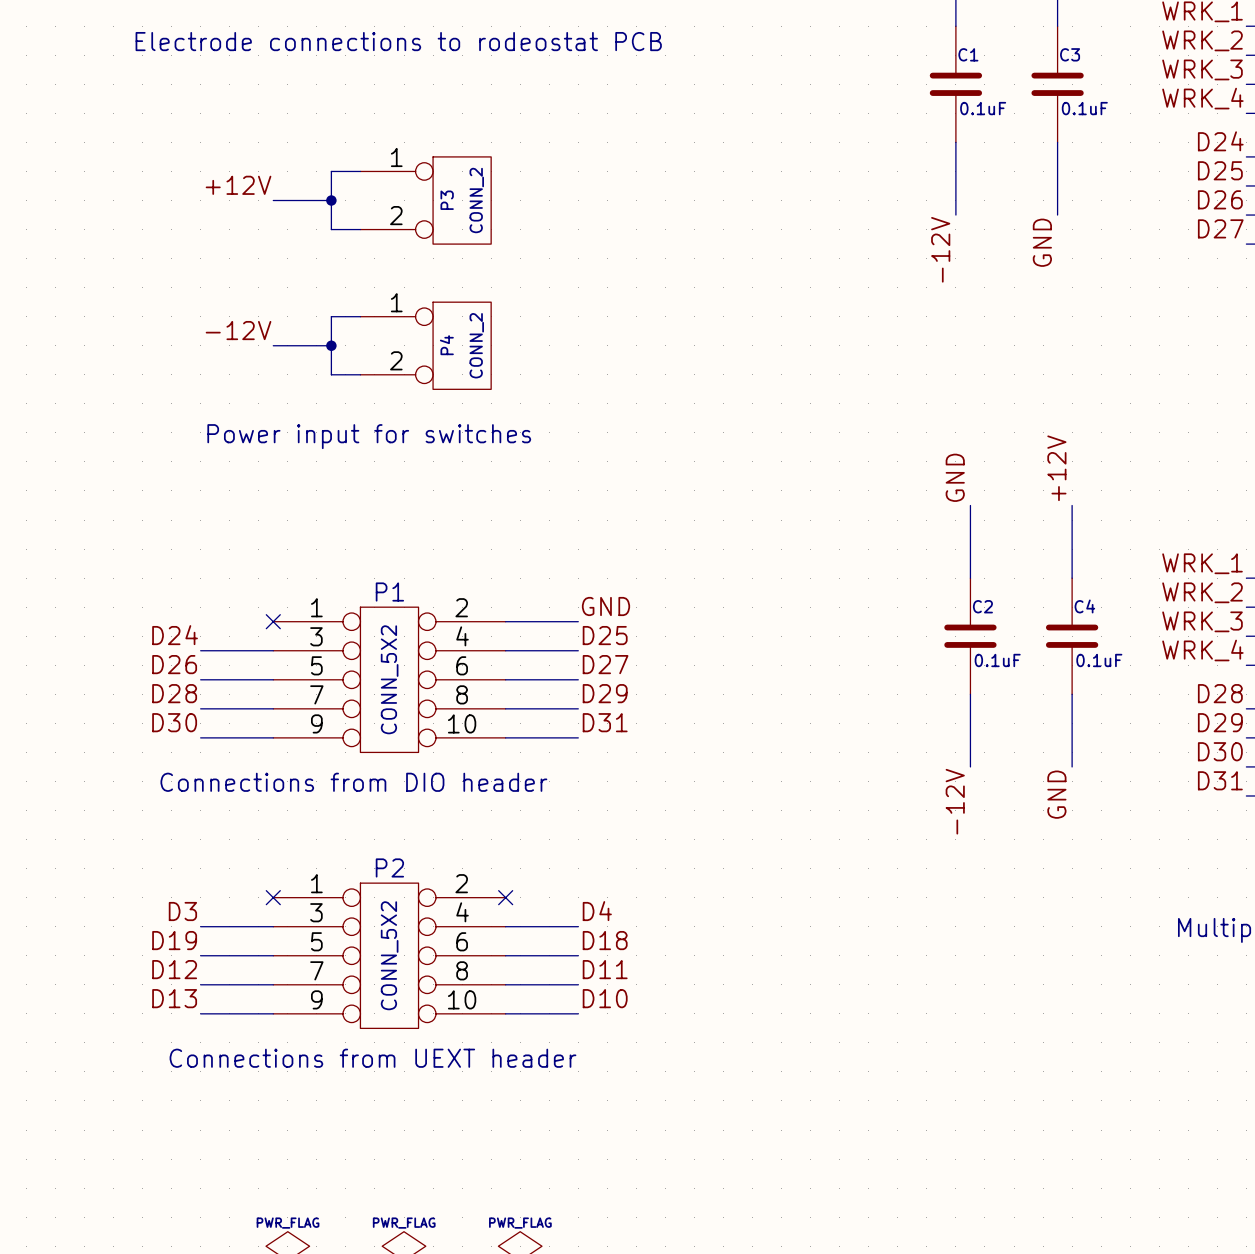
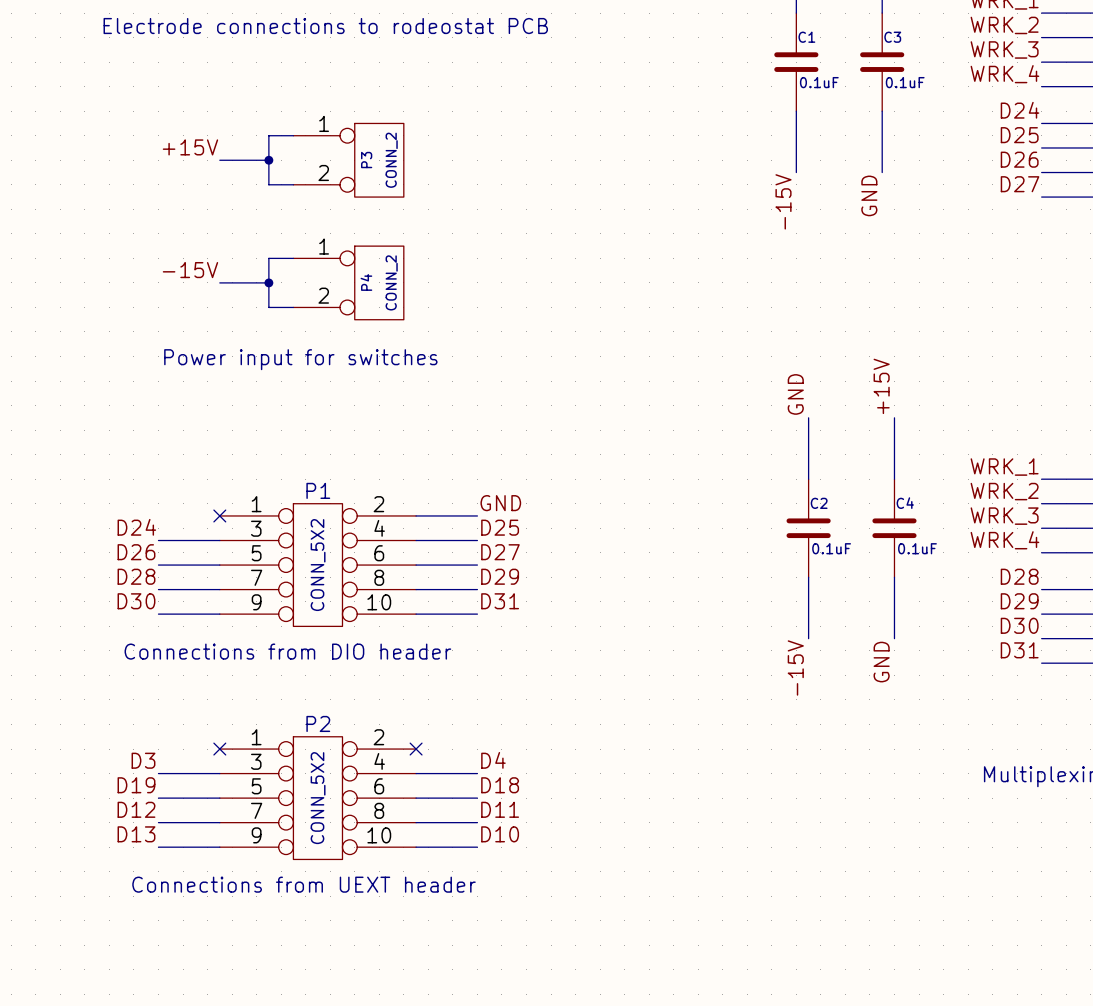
label: +12V (238, 185) -> +15V (190, 147)
label: -12V (940, 249) -> -15V (783, 201)
label: -12V (238, 330) -> -15V (190, 270)
label: +12V (1056, 468) -> +15V (881, 386)
label: -12V (955, 801) -> -15V (795, 668)

